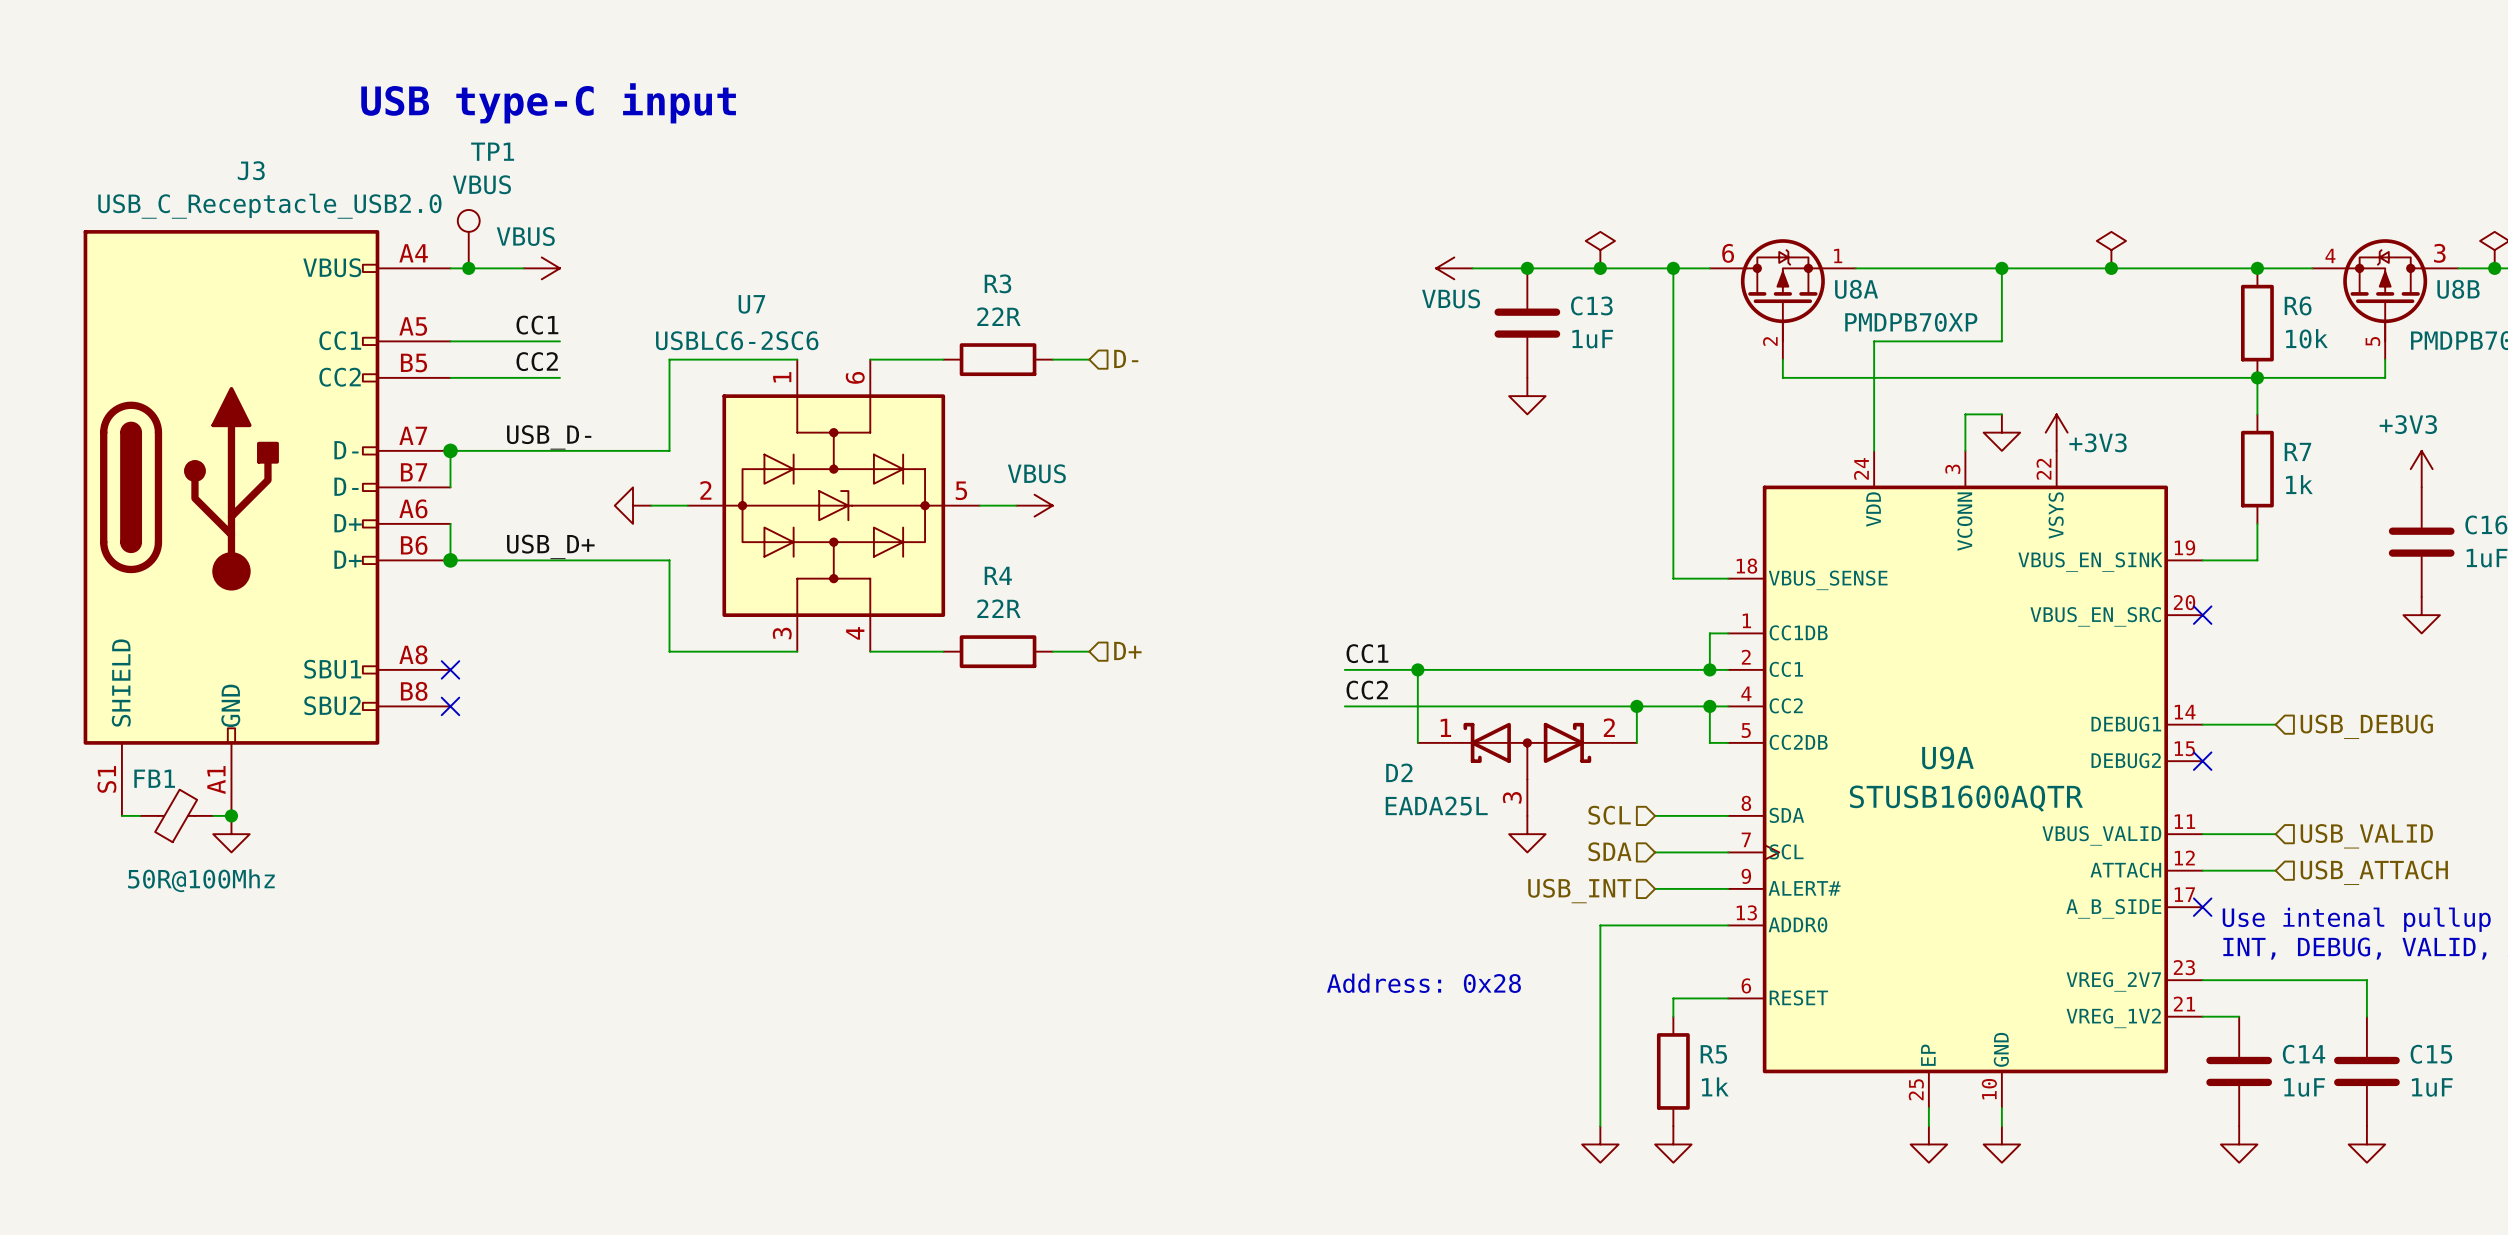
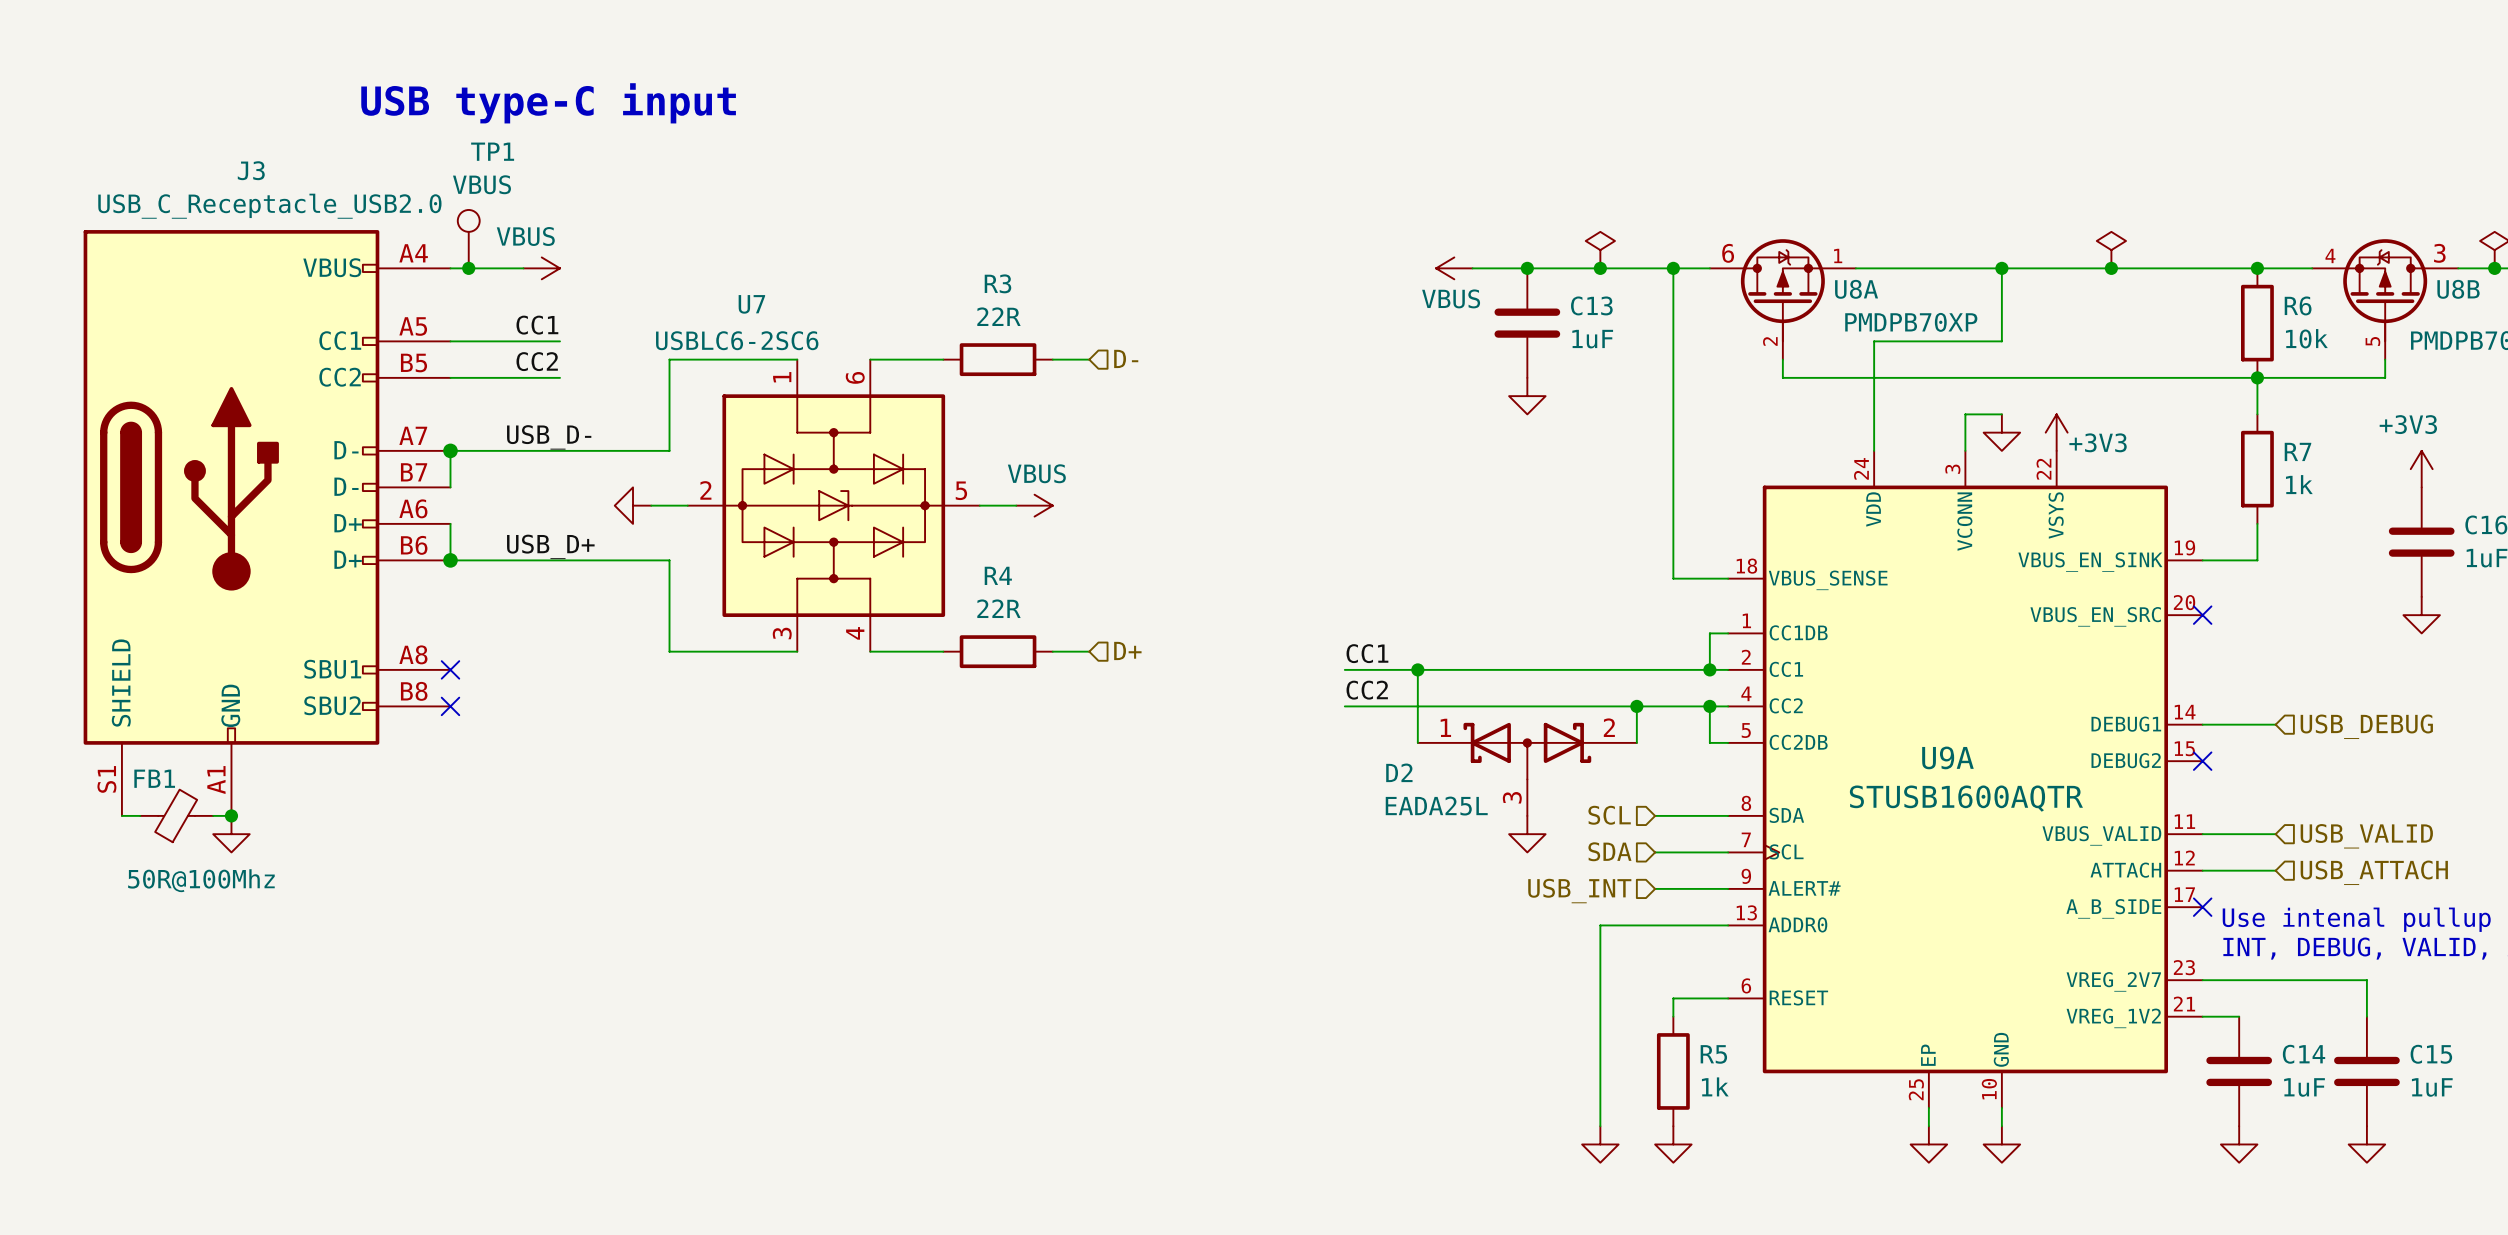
text: Address: 0x28 (1423, 983) -> none

